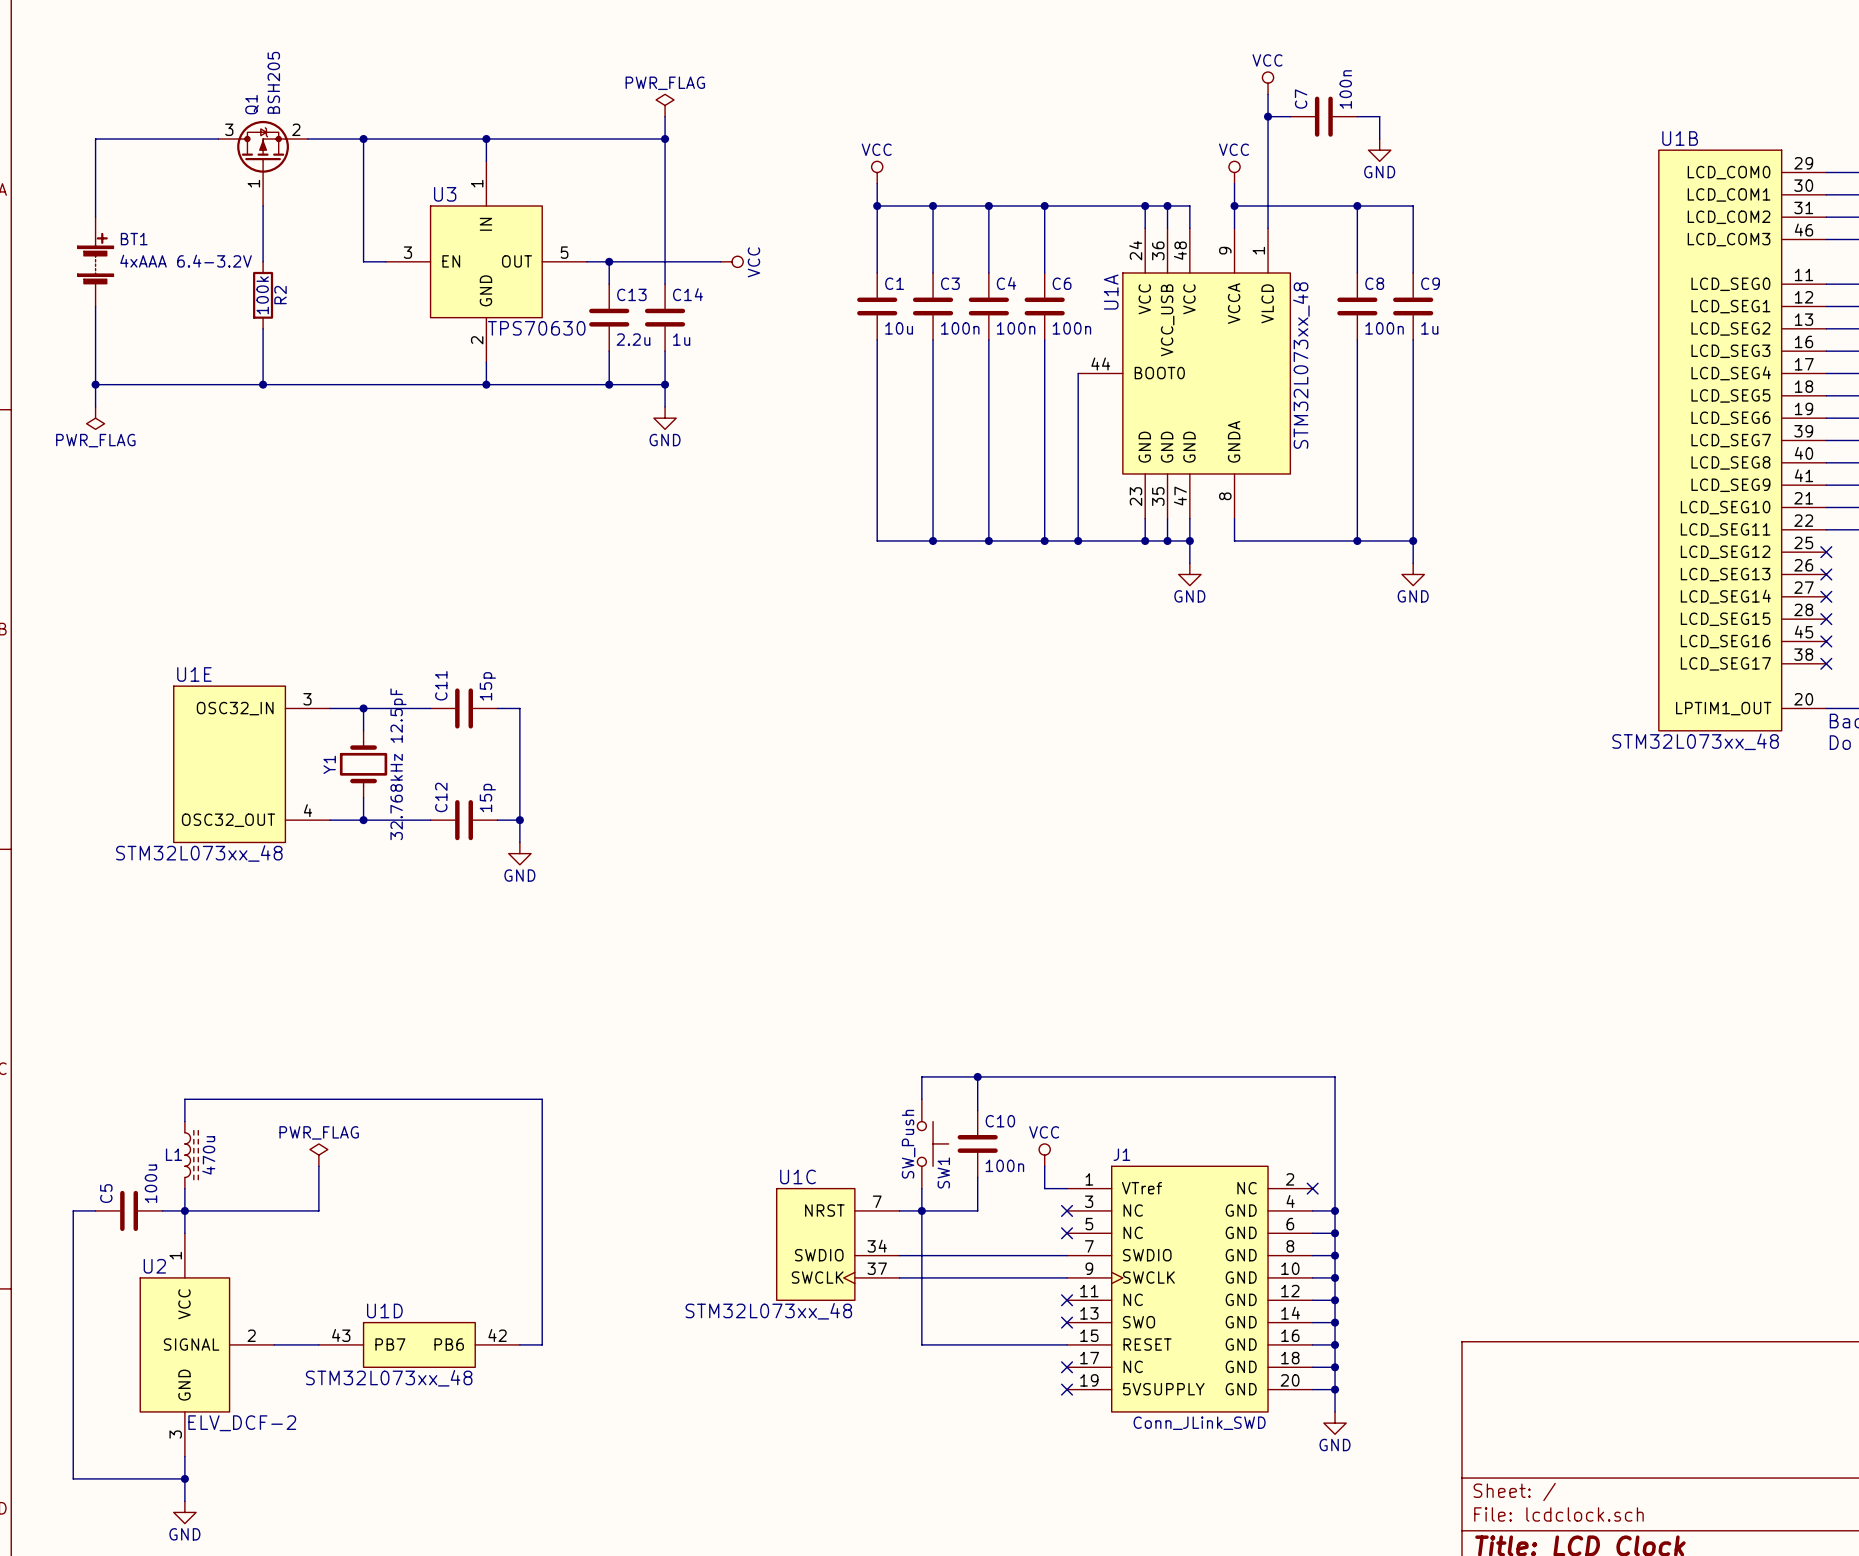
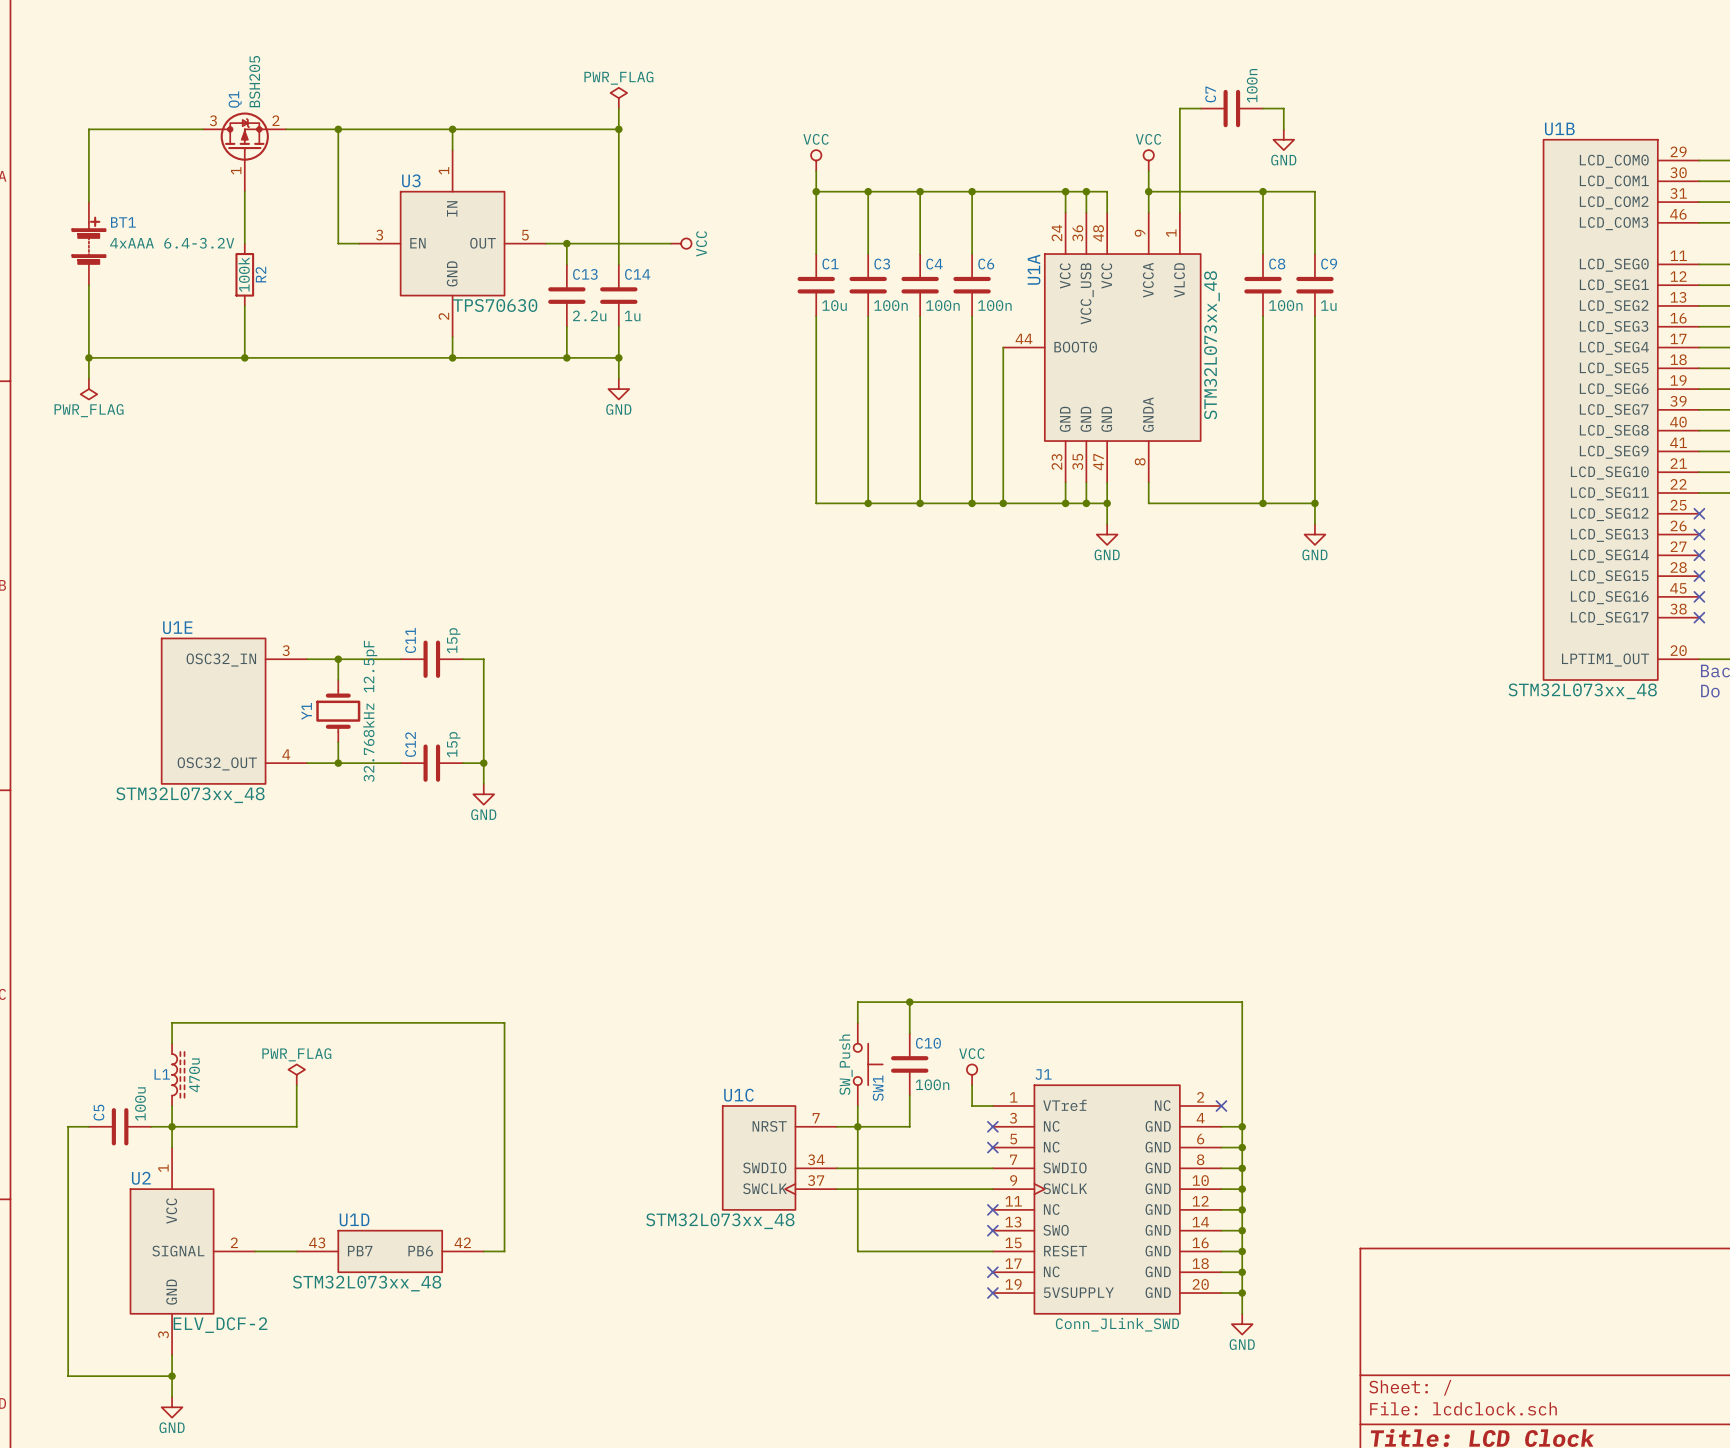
power symbol: VCC (1268, 83) -> none
wire: (1268, 94) (1268, 116) -> none
junction: (1268, 116) -> none

